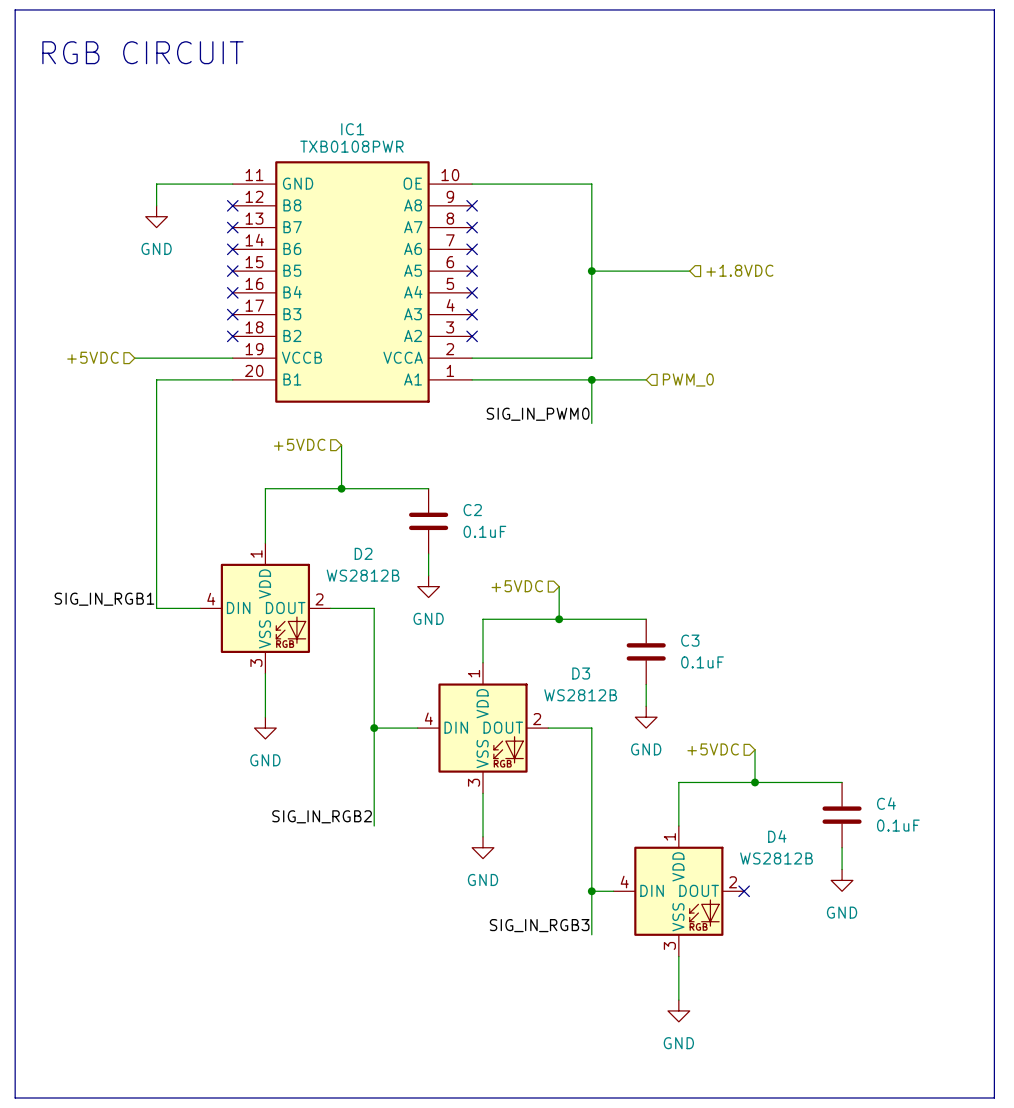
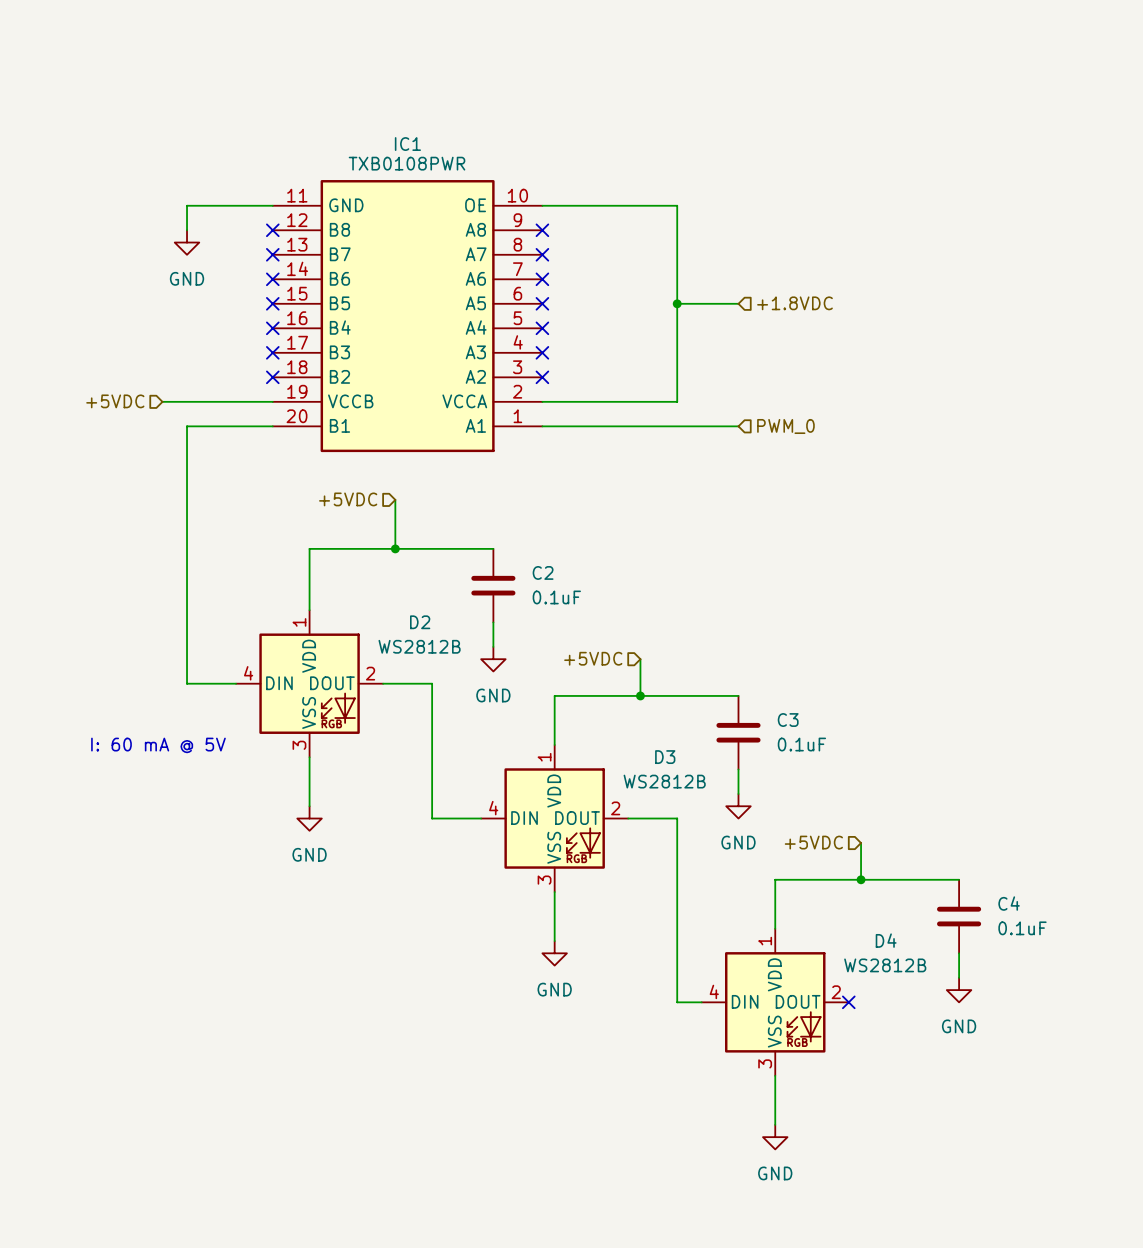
line: (15, 9) (994, 9) (994, 1097) (15, 1097) (15, 9) -> none
text: RGB CIRCUIT (142, 52) -> none
hierarchical label position: +1.8VDC (739, 270) -> +1.8VDC (794, 303)
wire: (646, 271) (689, 271) -> none
wire: (591, 379) (591, 423) -> none
junction: (591, 379) -> none
label: SIG_IN_PWM0 (538, 414) -> none
label: SIG_IN_RGB1 (104, 599) -> none
text: none -> I: 60 mA @ 5V (158, 745)
wire: (374, 728) (374, 825) -> none
junction: (374, 728) -> none
label: SIG_IN_RGB2 (322, 816) -> none
wire: (591, 891) (591, 934) -> none
junction: (591, 891) -> none
label: SIG_IN_RGB3 (539, 925) -> none

